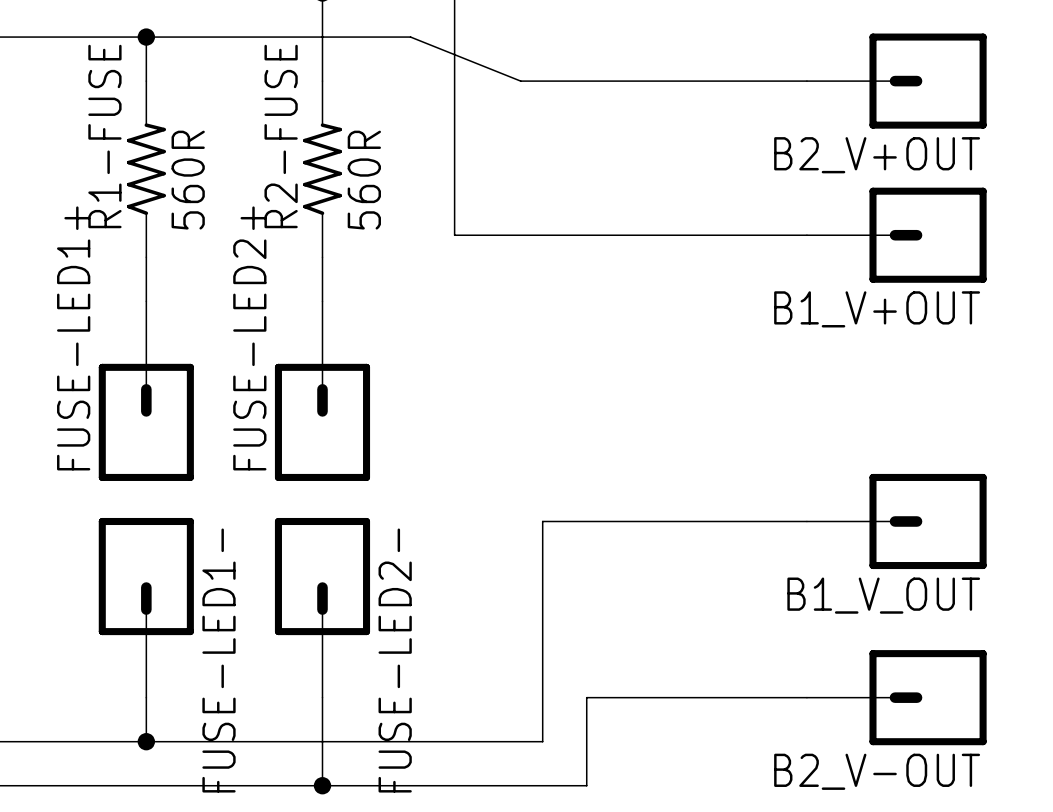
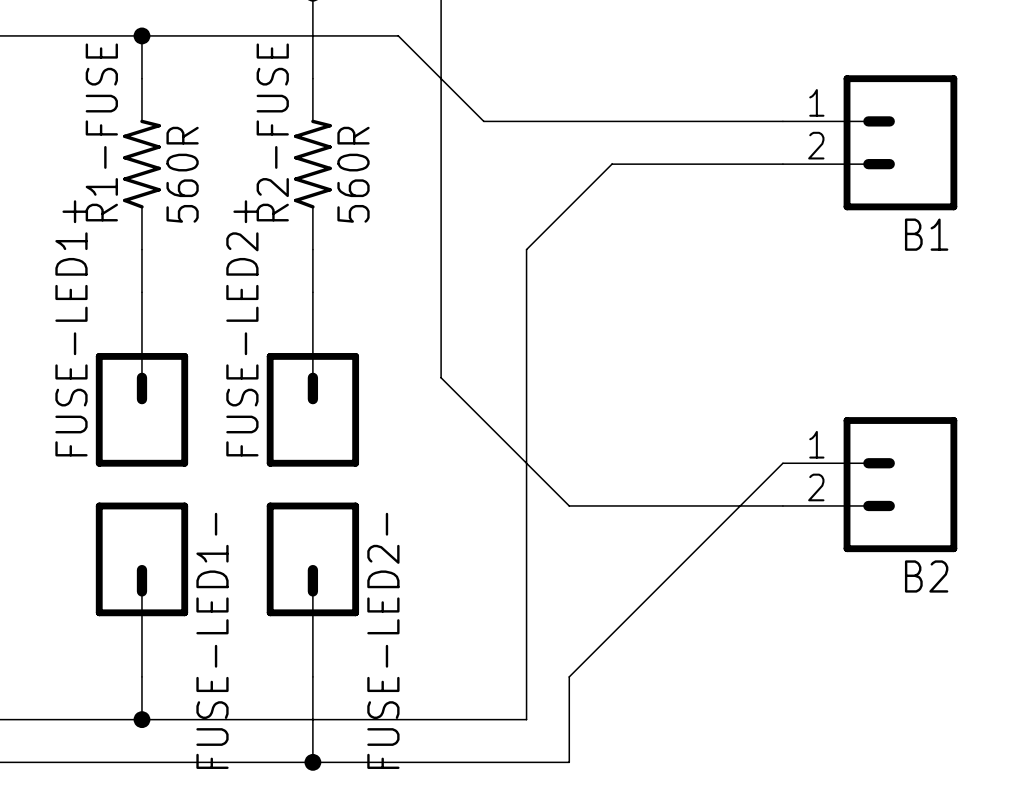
wire: (410, 37) (520, 81) (806, 81) -> (398, 35) (483, 121) (782, 121)
B2_V+OUT: (896, 81) -> none
B1: none -> (870, 142)
wire: none -> (782, 164) (612, 164) (526, 249) (526, 505)
wire: (454, 235) (806, 235) -> none
B1_V+OUT: (896, 235) -> none
B2: none -> (870, 484)
wire: (542, 521) (586, 521) -> (441, 228) (441, 377) (569, 505)
B1_V_OUT: (896, 521) -> none
wire: (586, 697) (806, 697) -> (569, 676) (782, 463)
B2_V-OUT: (896, 697) -> none

